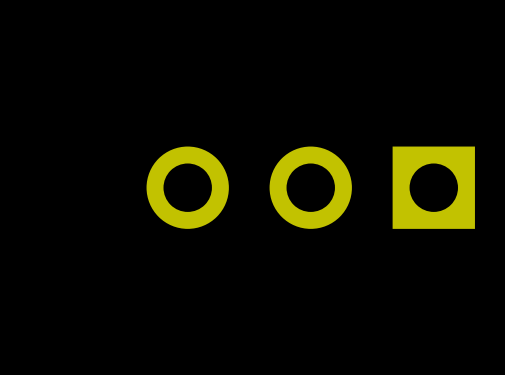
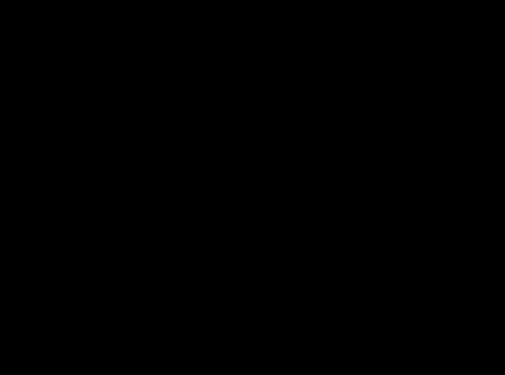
part: (310, 187) -> none

